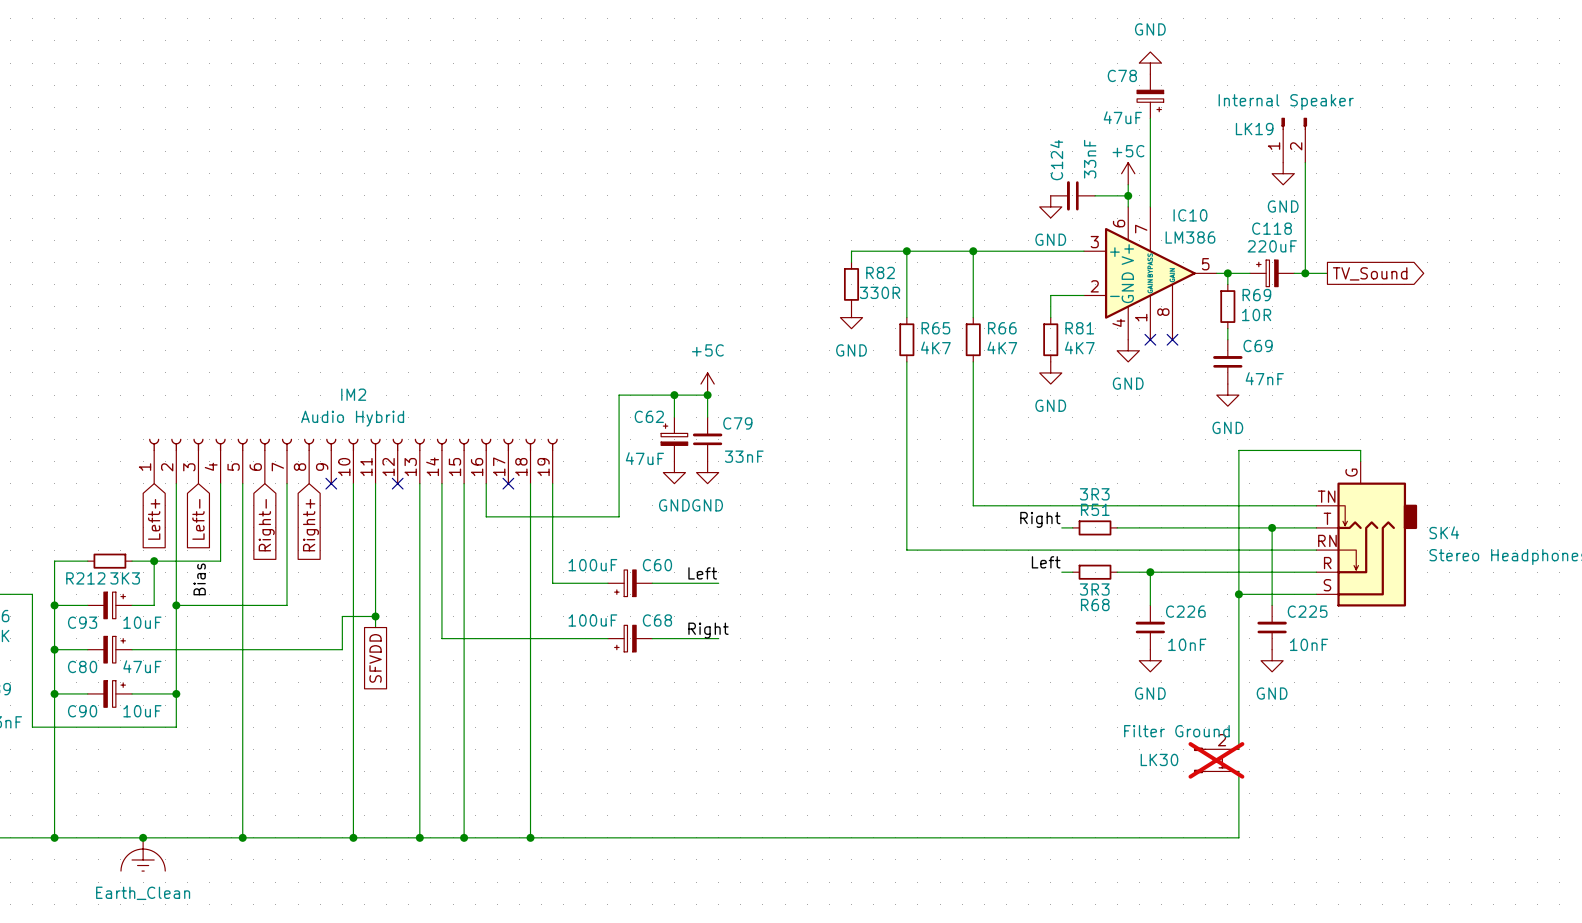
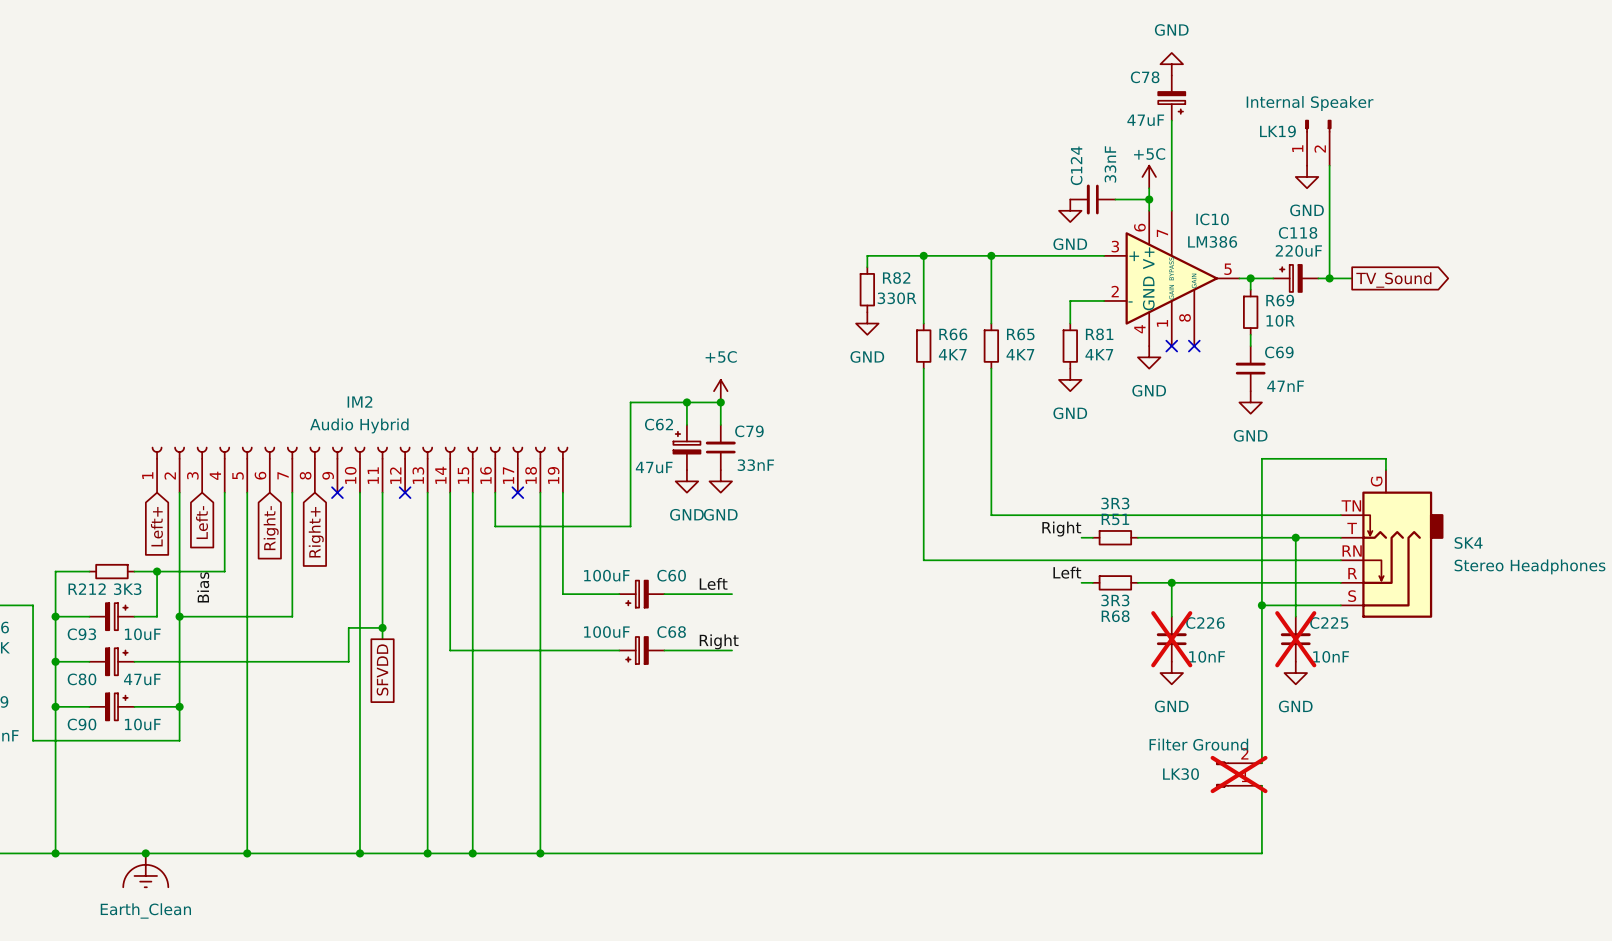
R65 name: R65 (935, 328) -> R66 (953, 334)
R66 name: R66 (1002, 328) -> R65 (1020, 334)
C226 do-not-place cross: none -> (1171, 639)
C225 do-not-place cross: none -> (1295, 639)

